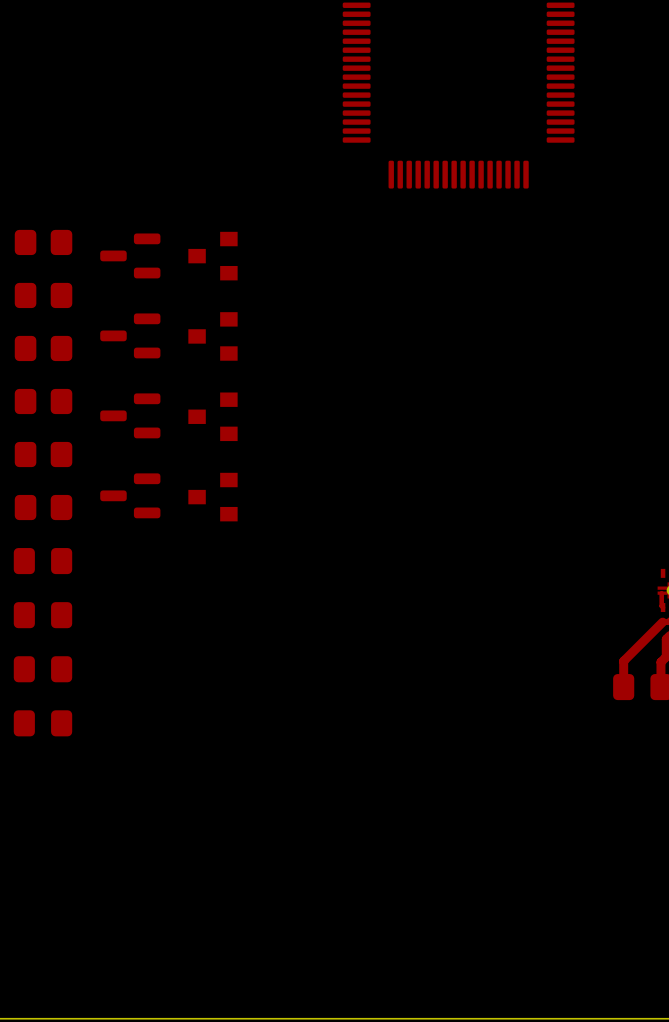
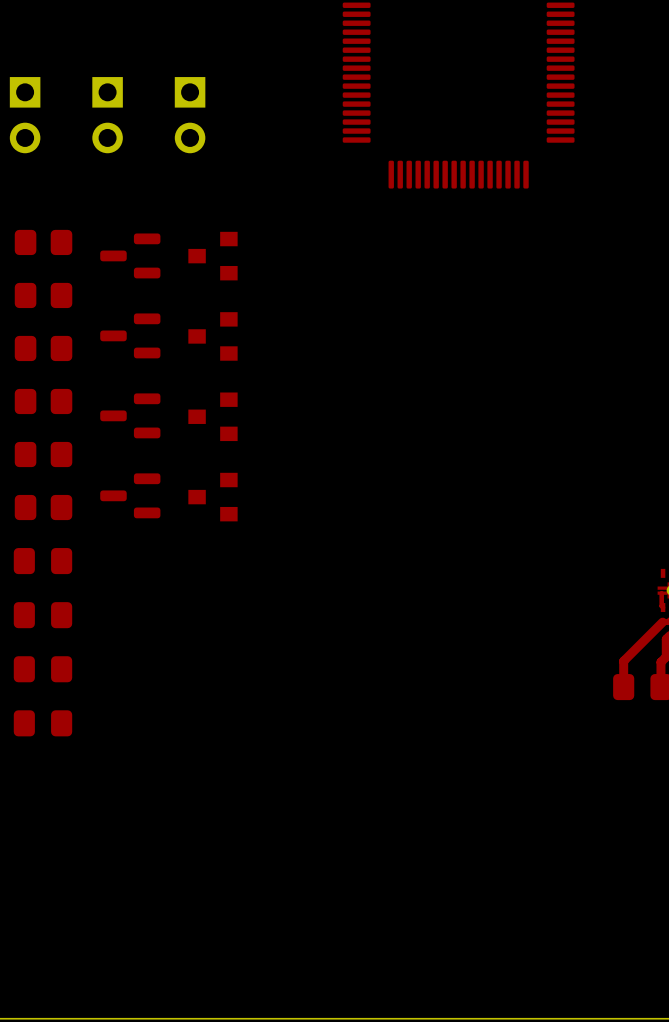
part: none -> (25, 115)
part: none -> (107, 115)
part: none -> (190, 115)

